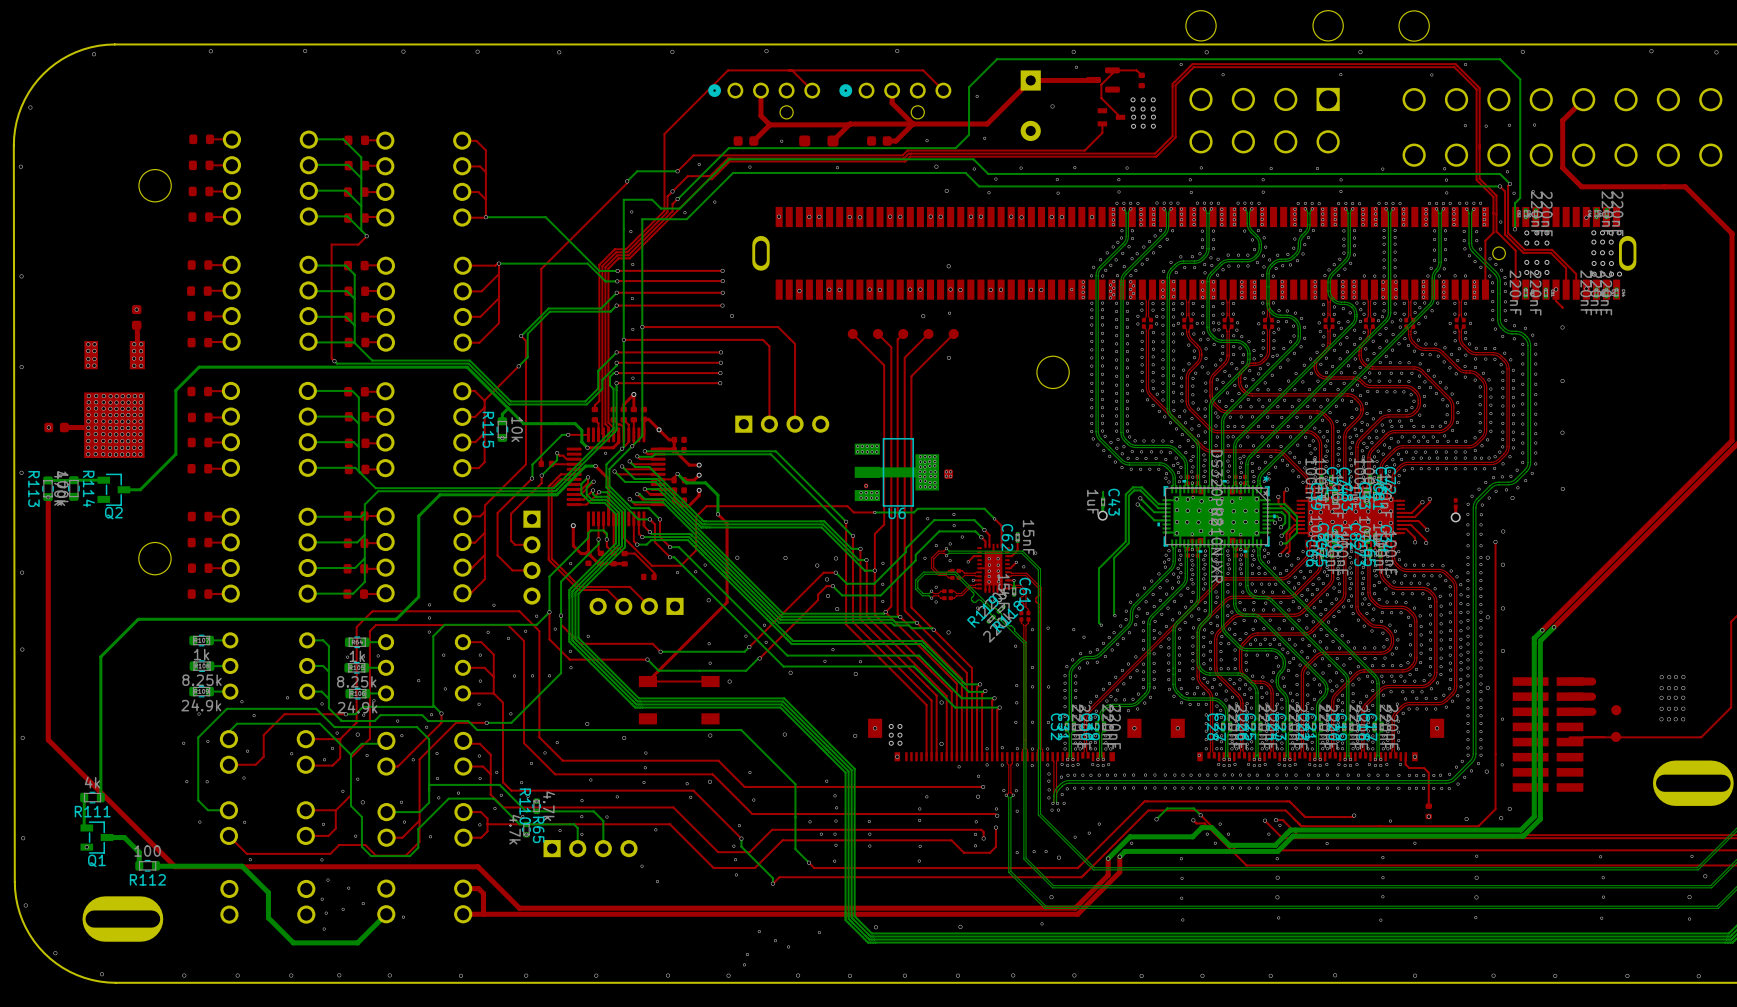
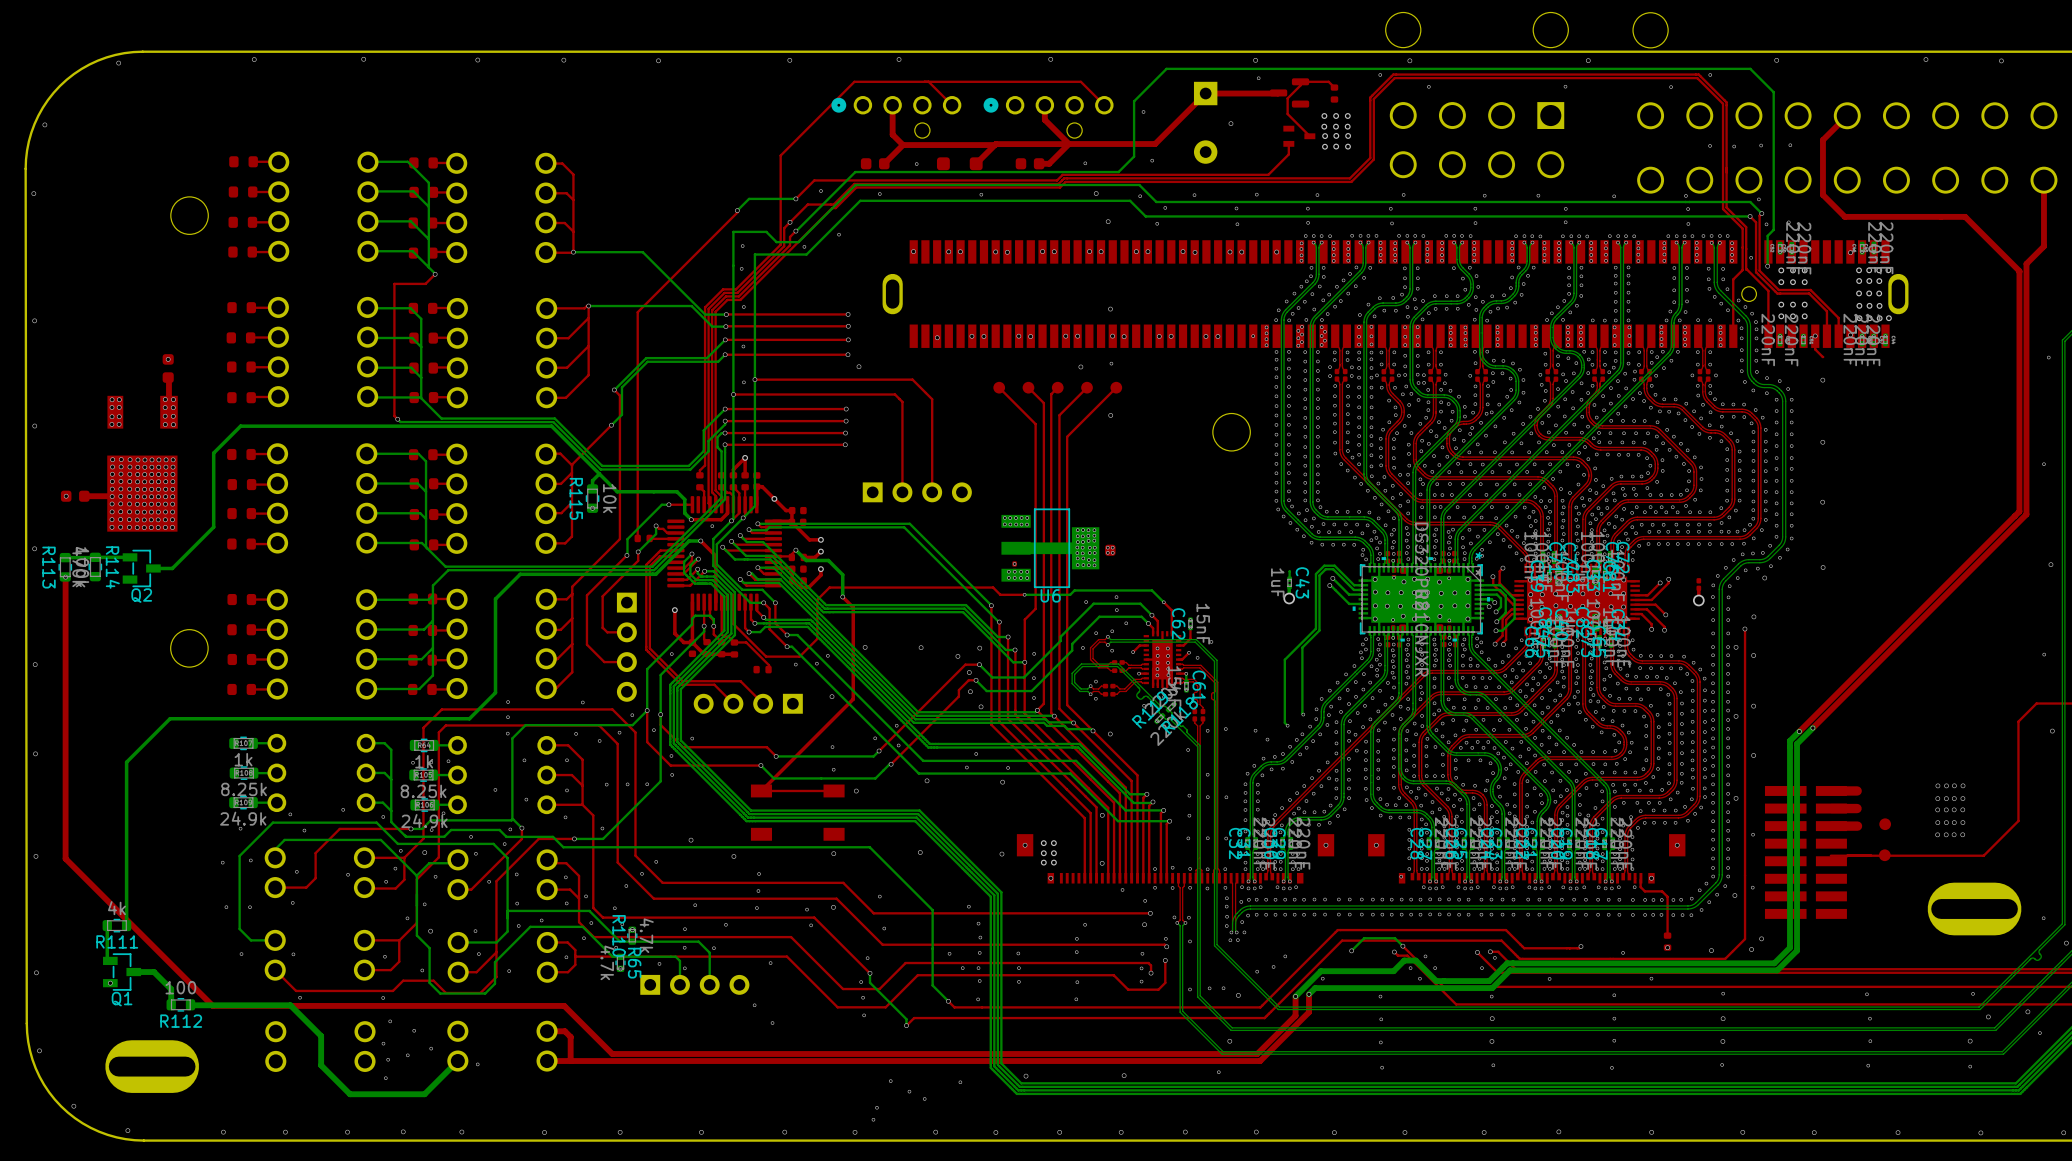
via: (1187, 499) -> none

